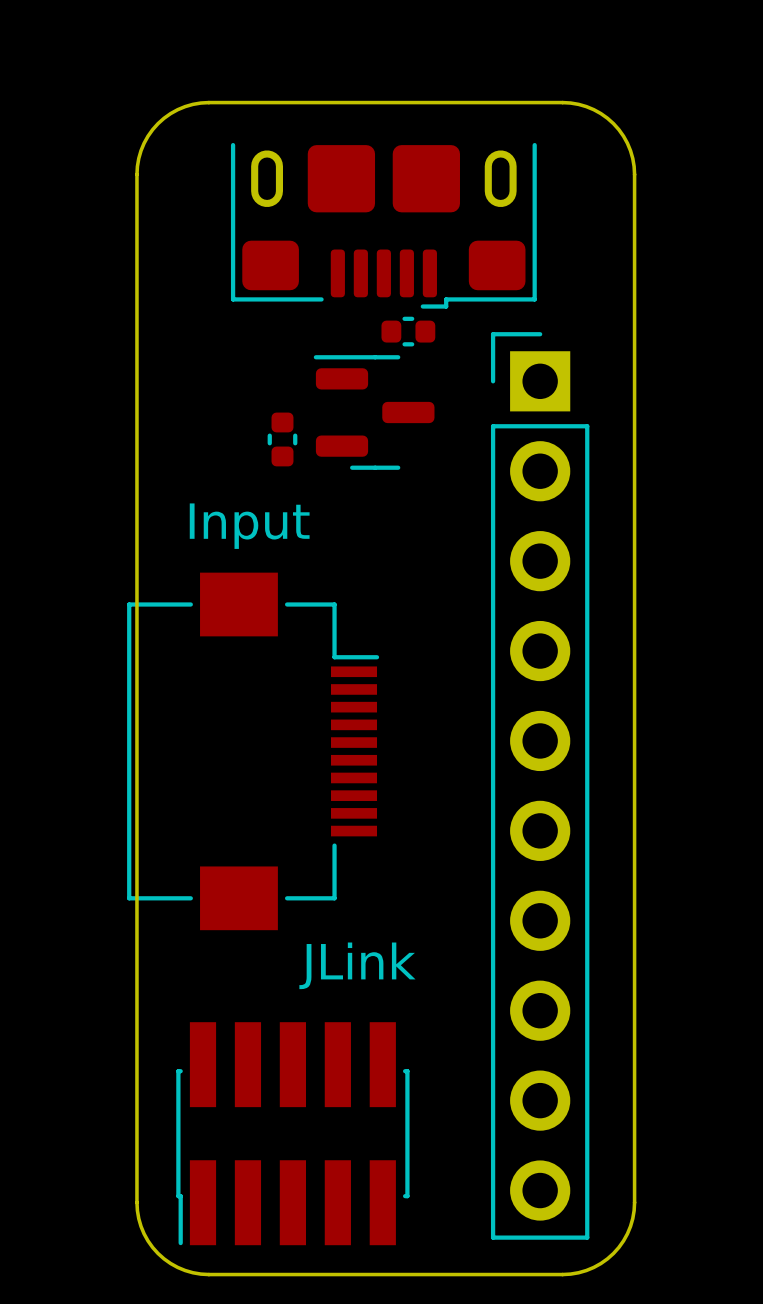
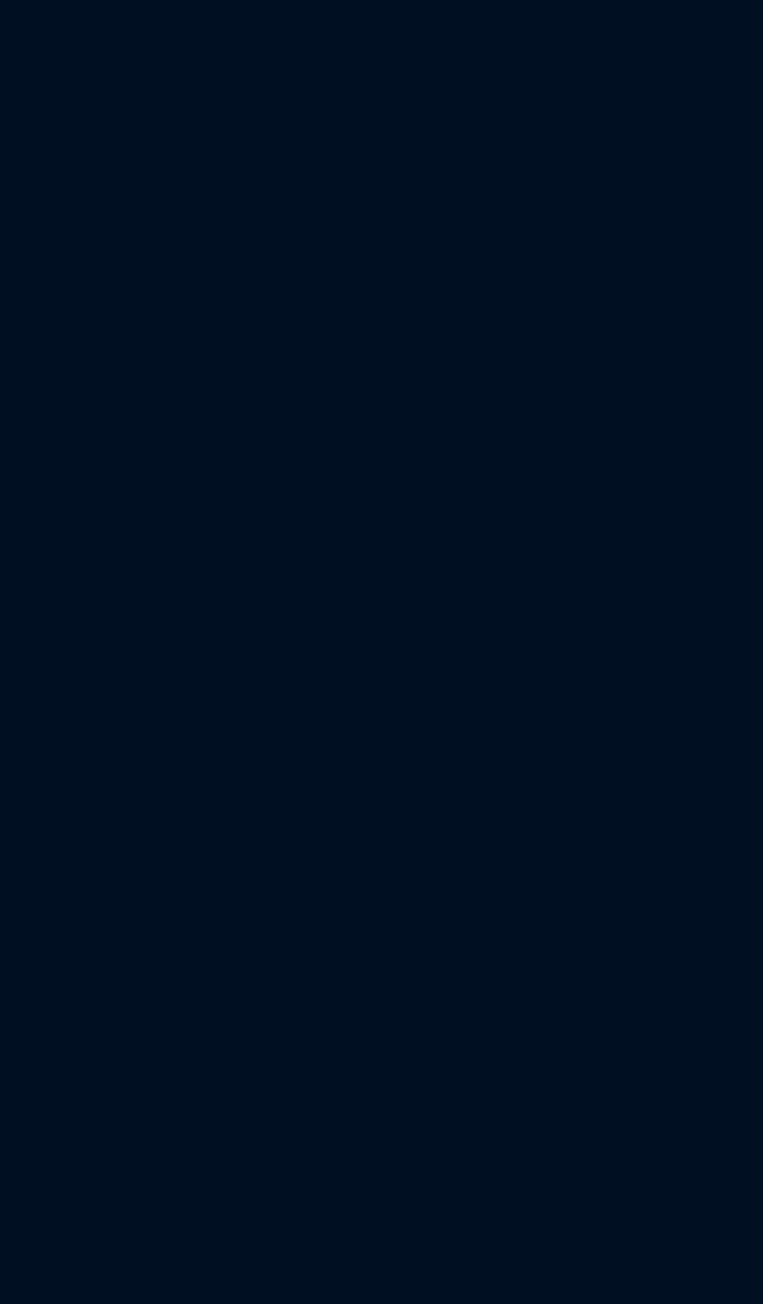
board edge: (208, 102) (570, 103) (593, 109) (607, 118) (618, 129) (630, 150) (634, 174) (634, 1202) (630, 1226) (618, 1247) (607, 1258) (586, 1270) (562, 1274) (200, 1274) (177, 1267) (164, 1258) (147, 1240) (141, 1226) (136, 1202) (137, 166) (144, 143) (158, 123) (177, 109) (192, 104) (208, 102) -> none
part: (383, 225) -> none
part: (408, 331) -> none
part: (374, 412) -> none
part: (282, 439) -> none
text: Input (249, 526) -> none
part: (253, 751) -> none
part: (540, 785) -> none
text: JLink (357, 965) -> none
part: (292, 1133) -> none

